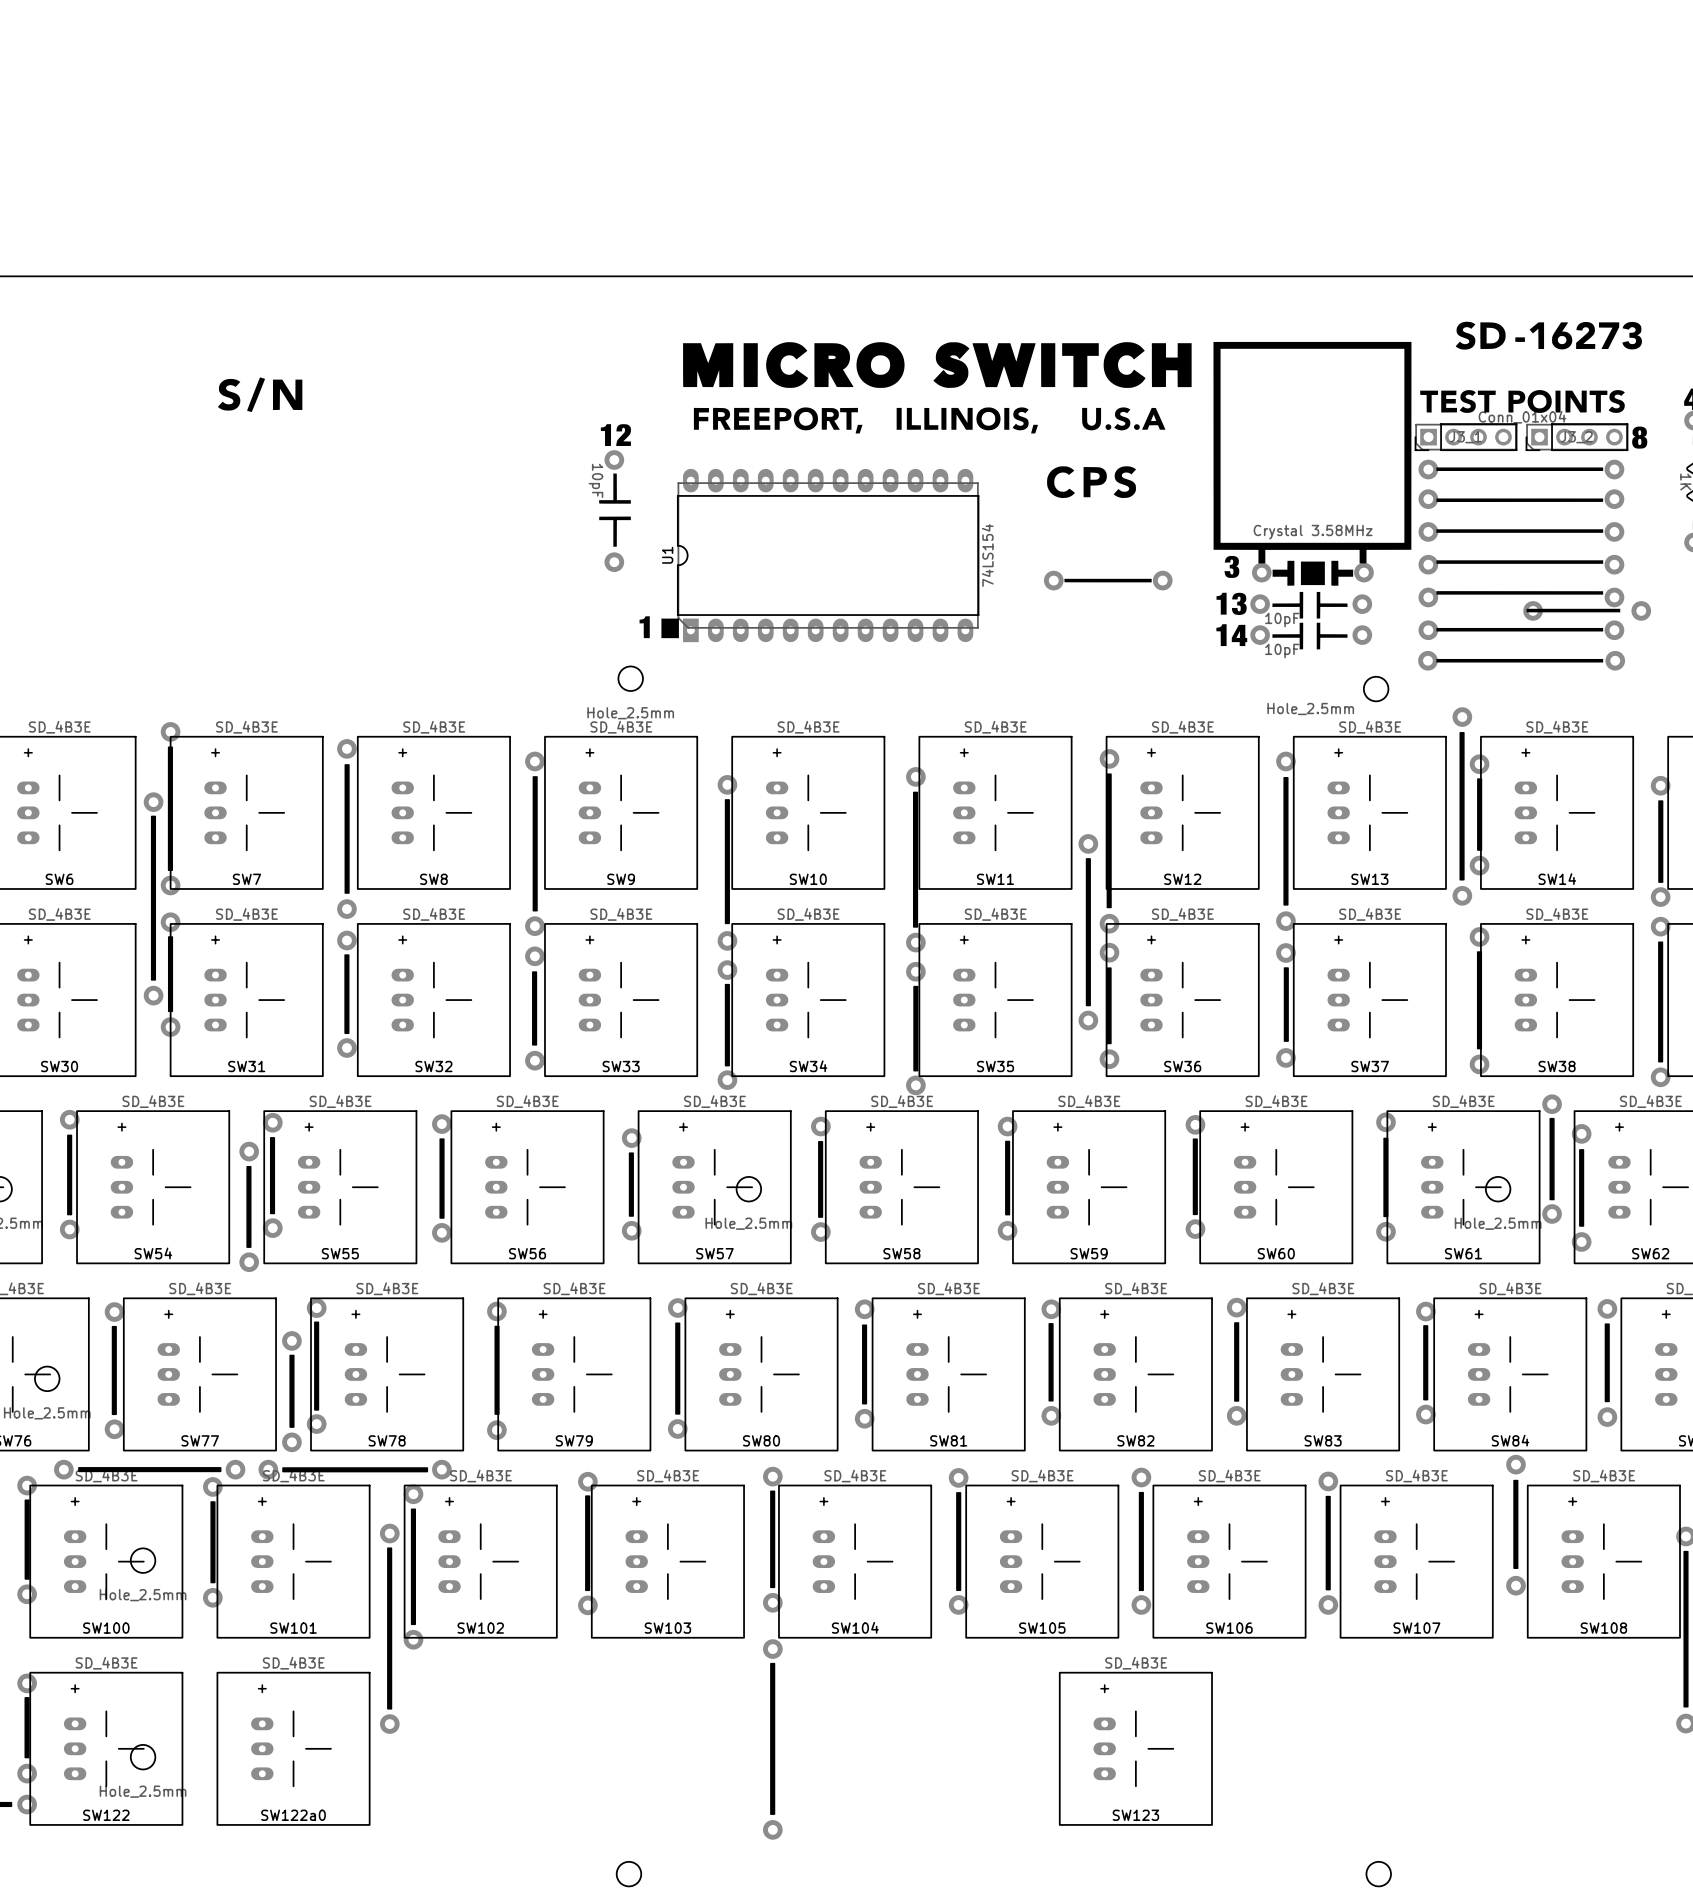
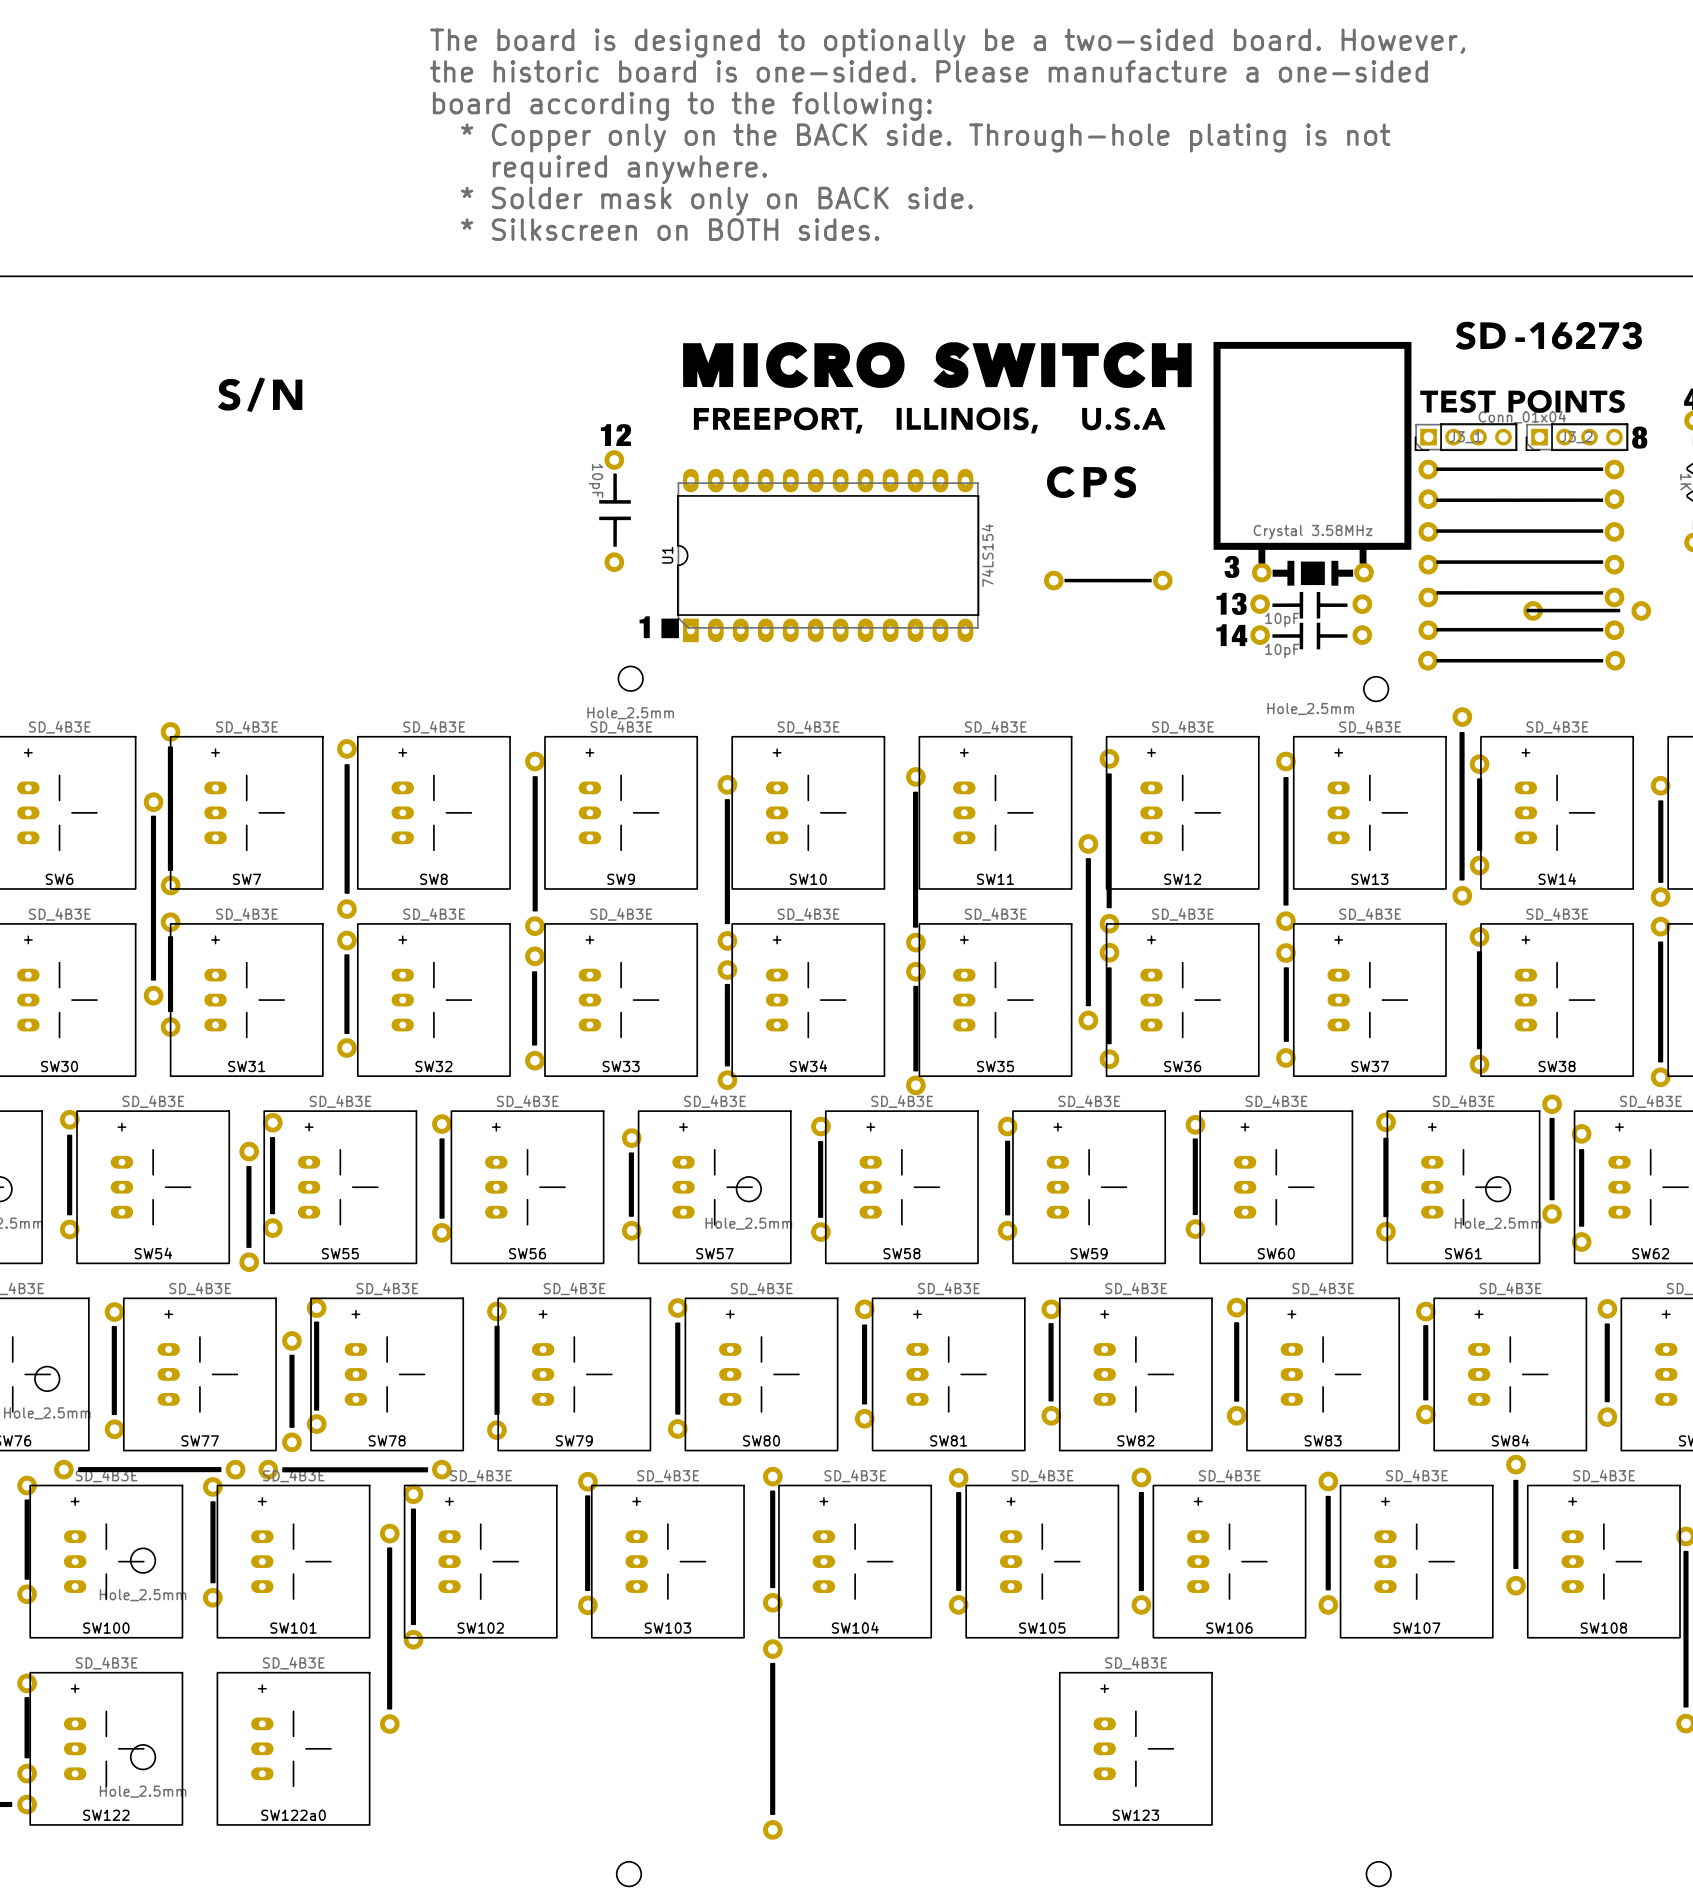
text: none -> The board is designed to optionally be a two-sided board. However, (947, 43)
text: none -> the historic board is one-sided. Please manufacture a one-sided (928, 71)
text: none -> board according to the following: (682, 106)
text: none -> * Copper only on the BACK side. Through-hole plating is not (925, 137)
text: none -> required anywhere. (629, 169)
text: none -> * Solder mask only on BACK side. (716, 201)
text: none -> * Silkscreen on BOTH sides. (670, 229)

